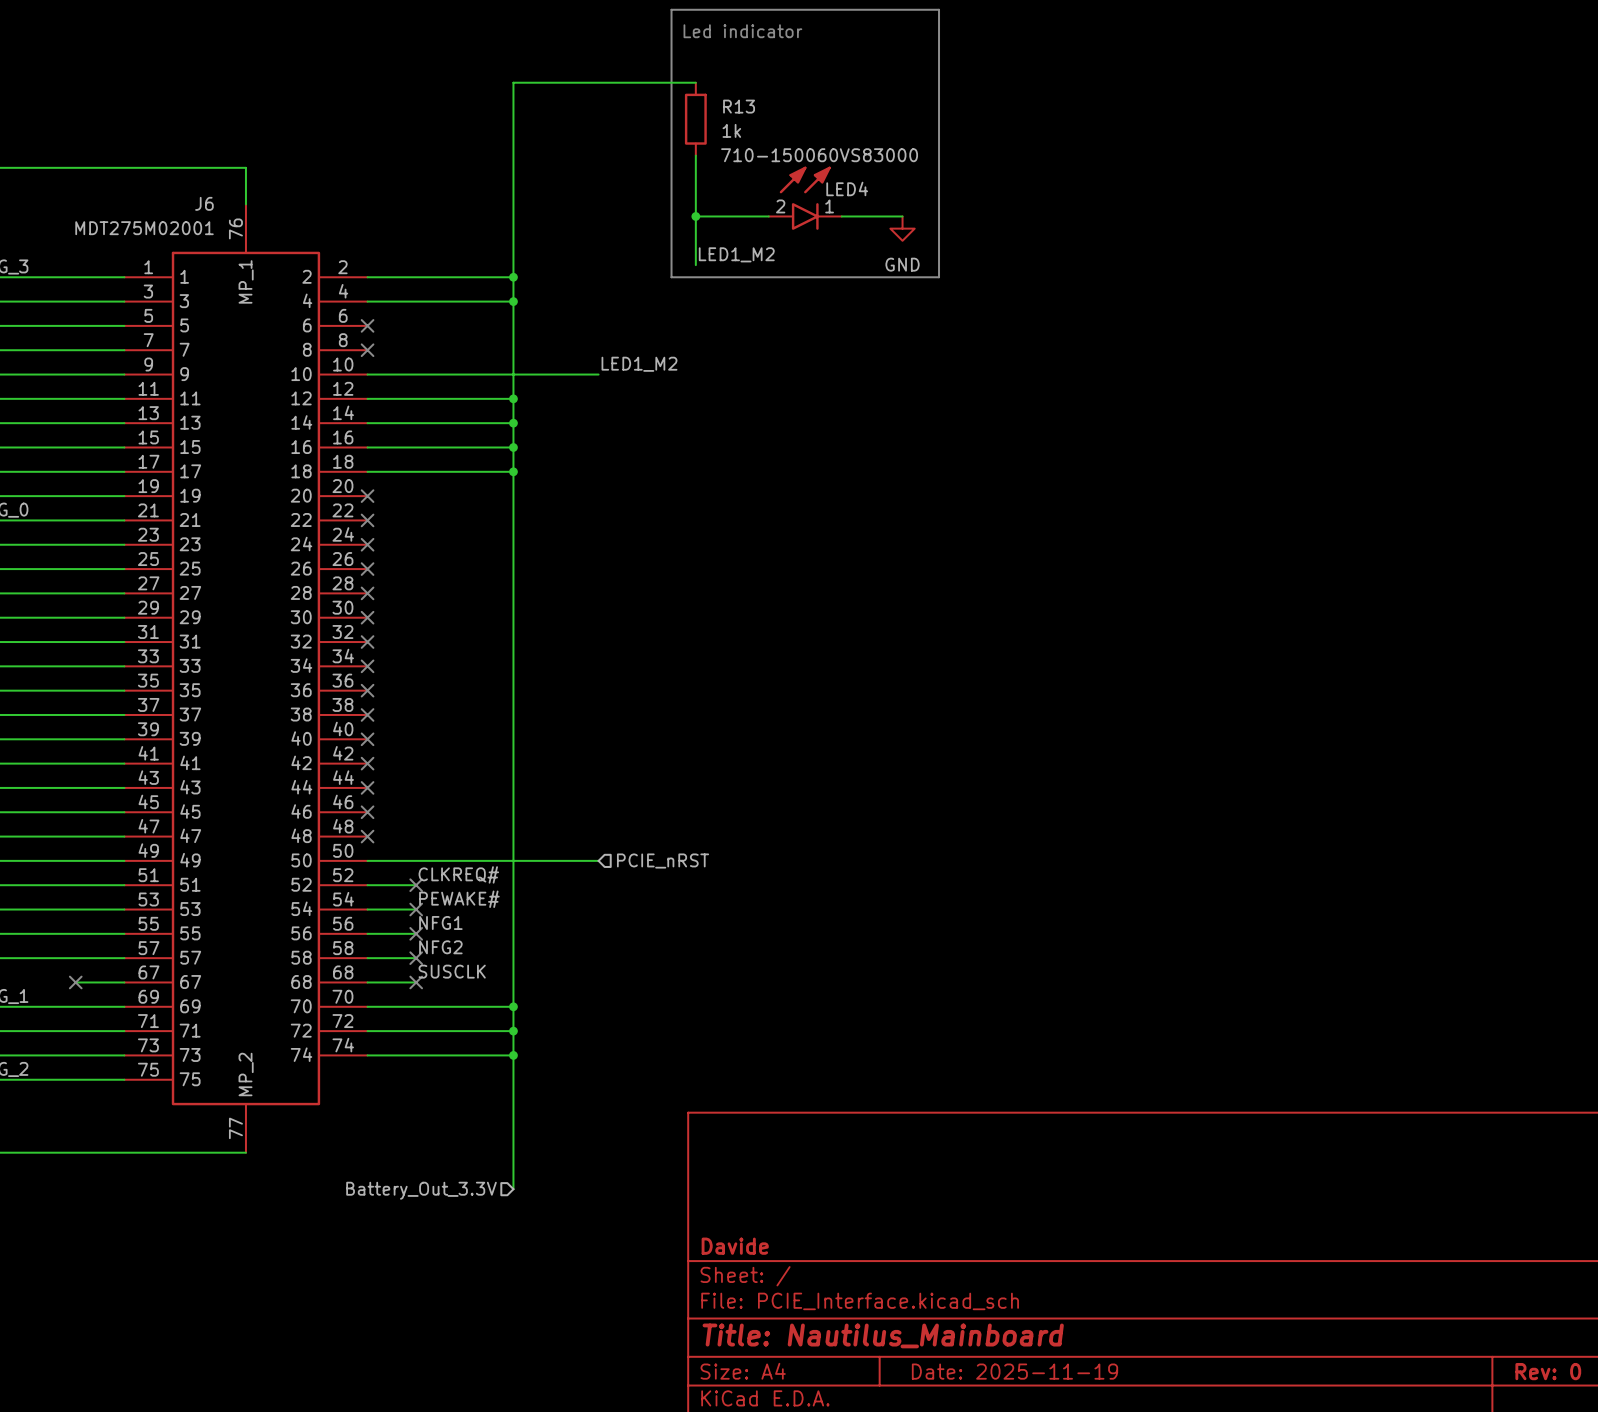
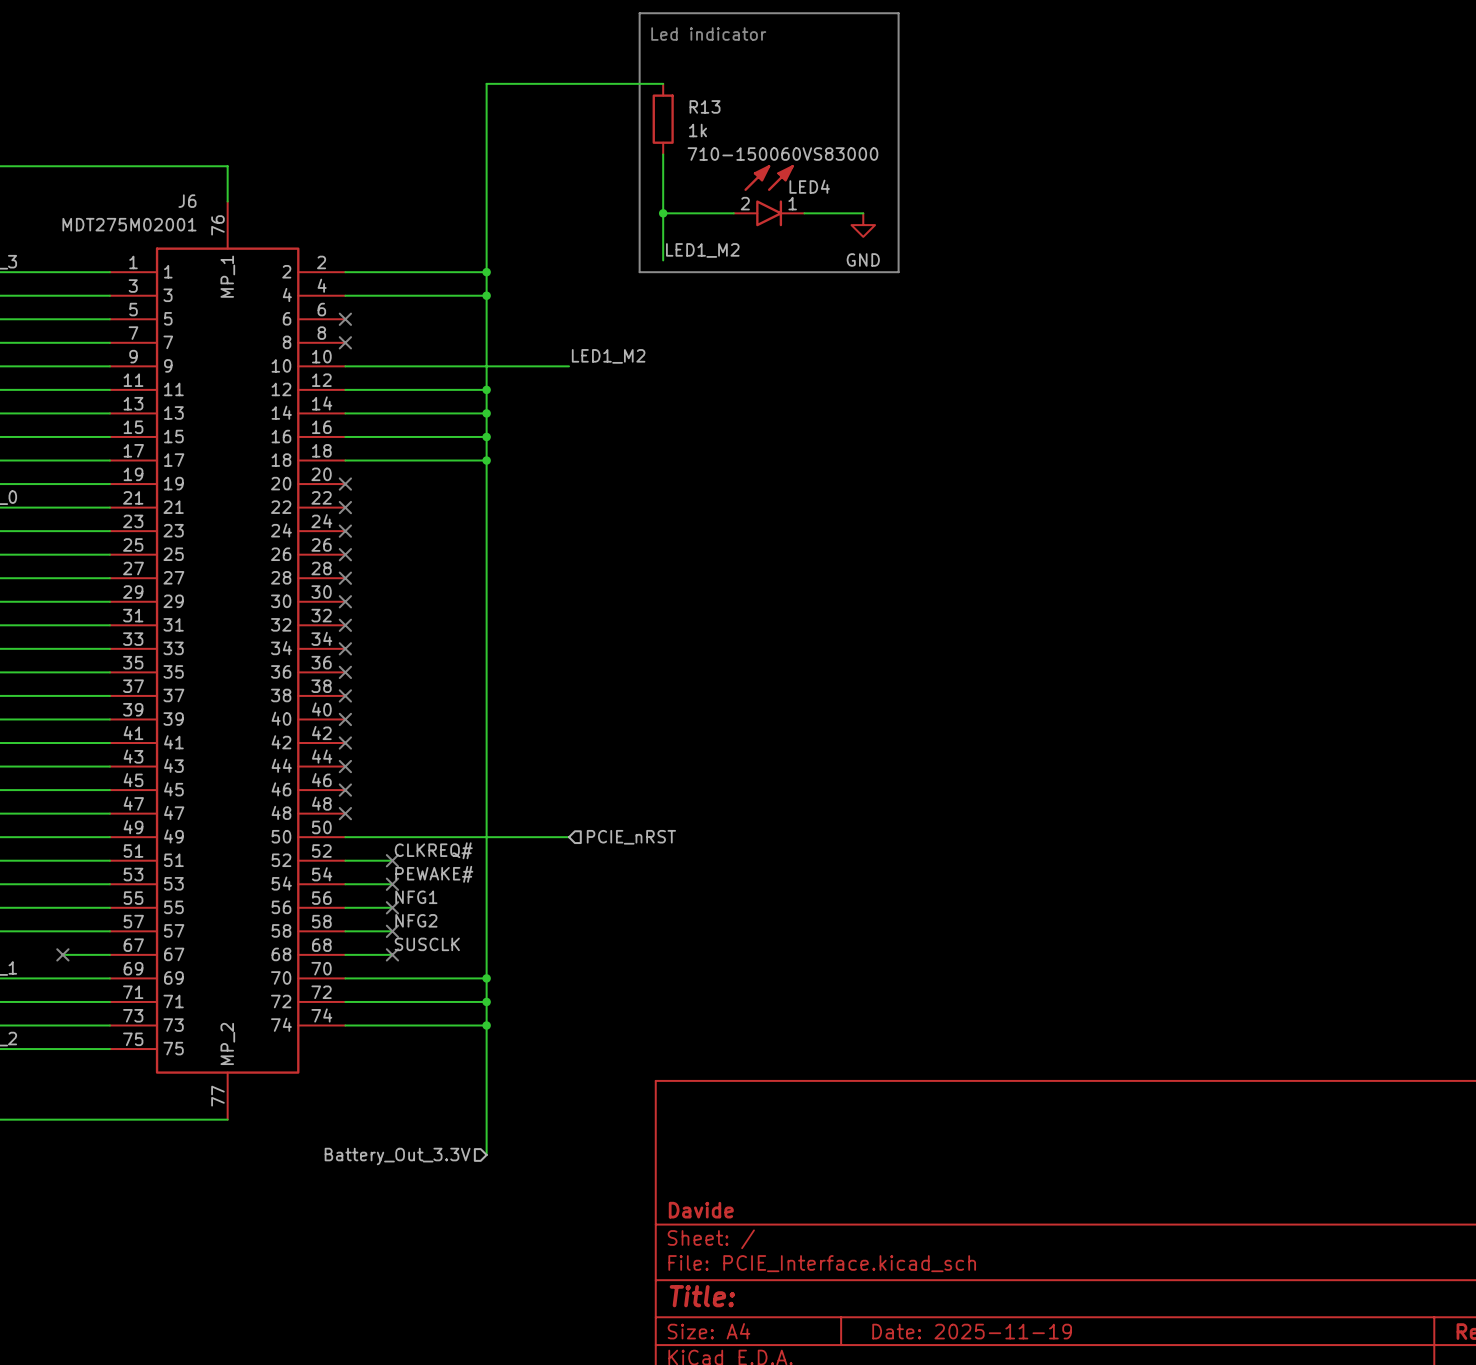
title block: Title: Nautilus_Mainboard (883, 1335) -> Title: (702, 1296)

